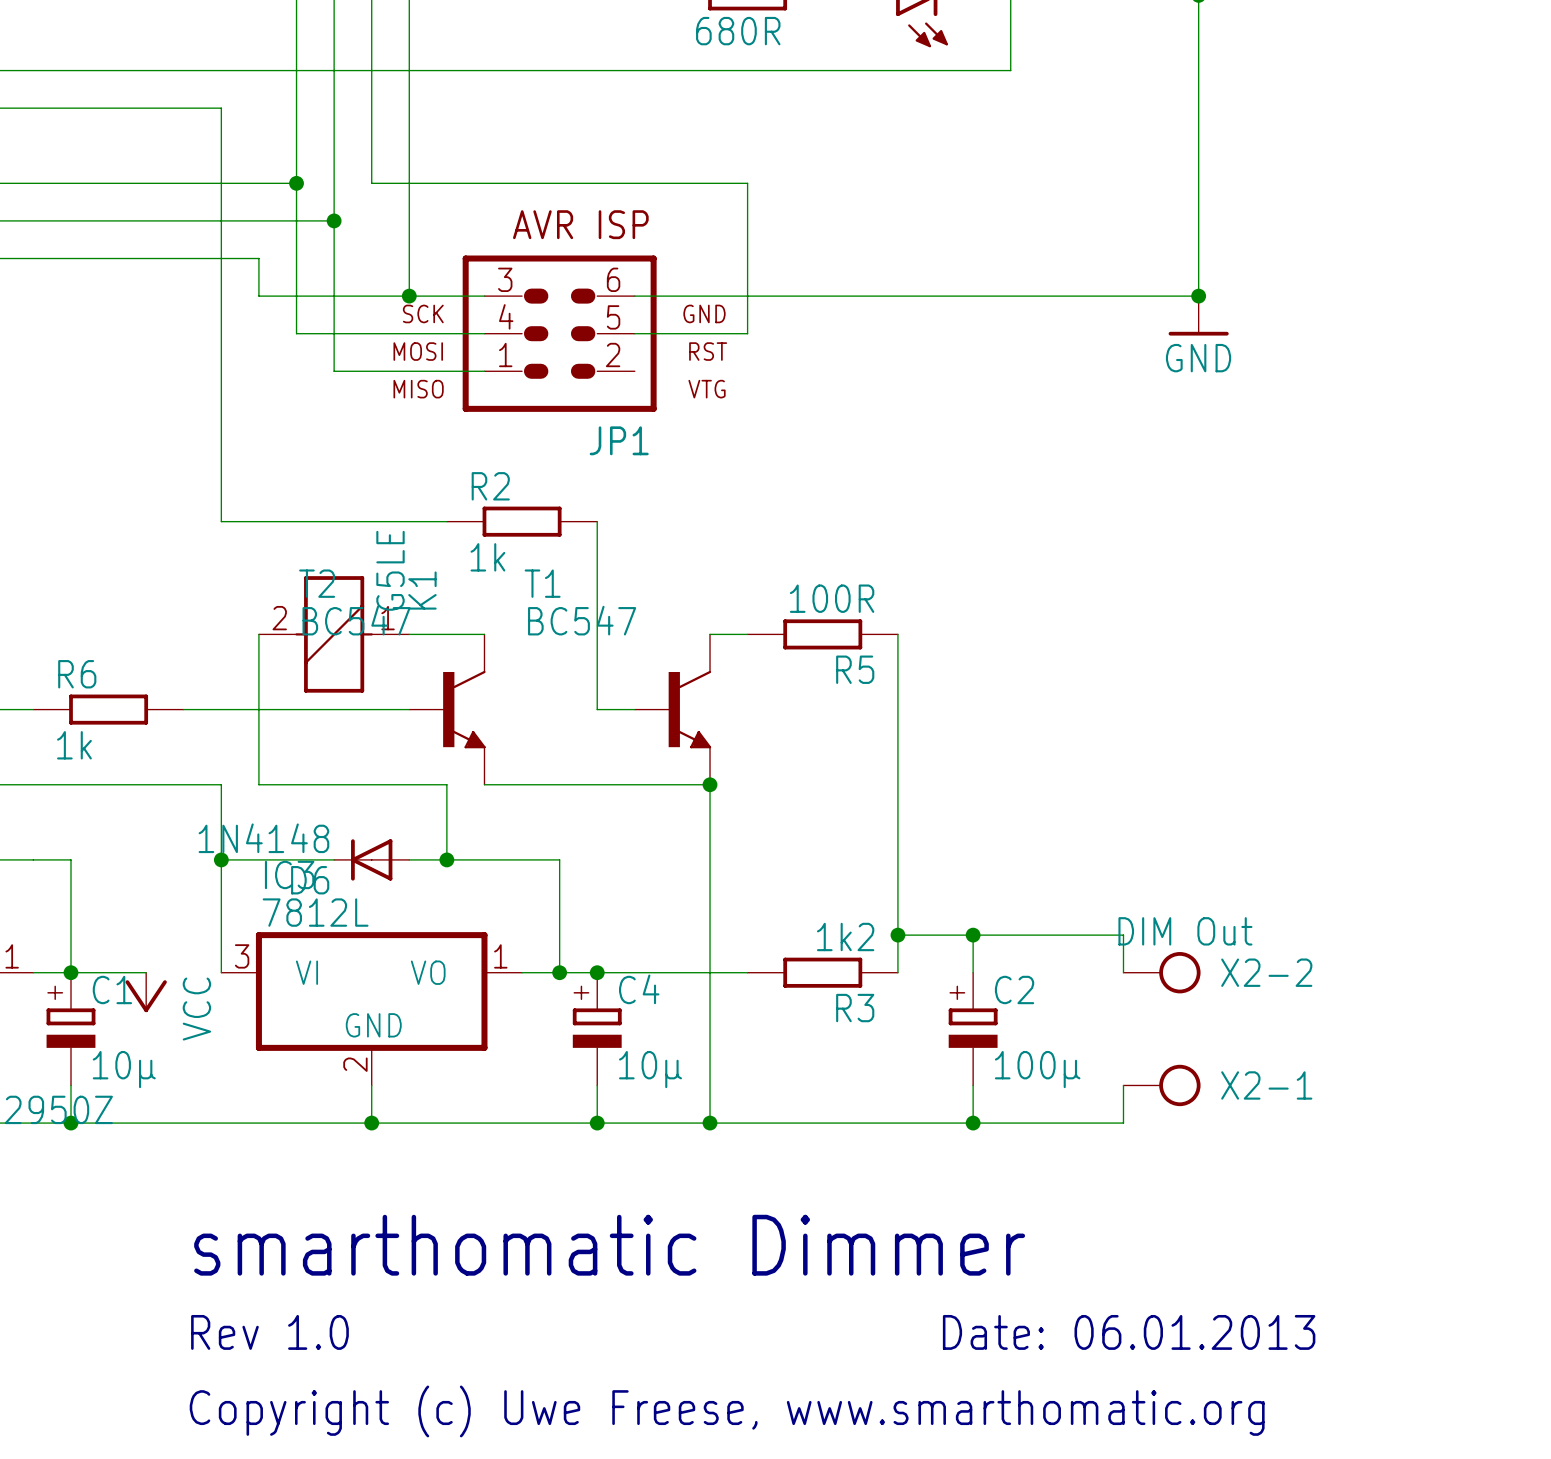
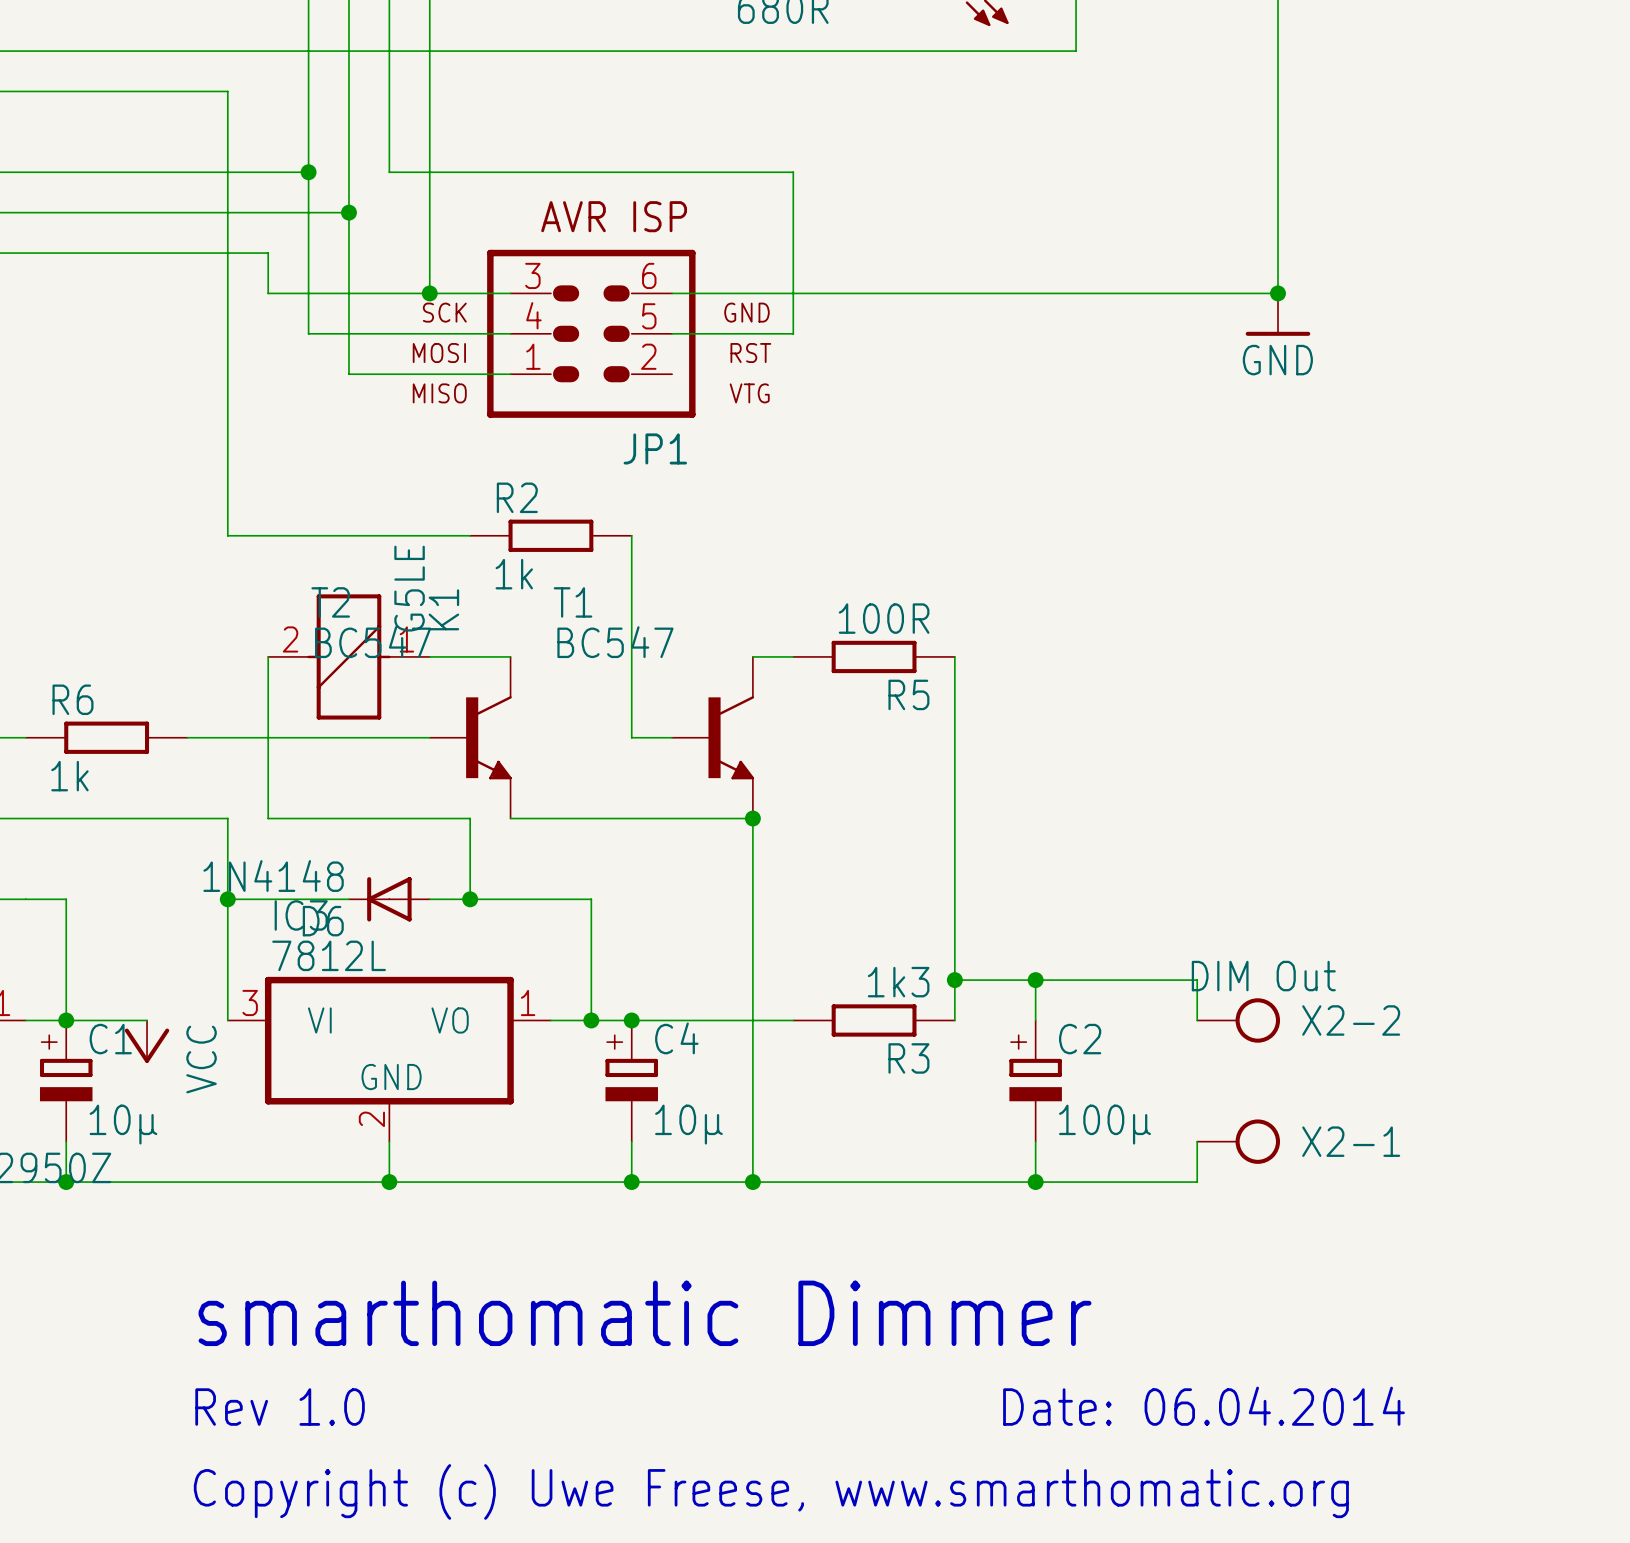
R3 value: 1k2 (845, 936) -> 1k3 (898, 982)
text: Date: 06.01.2013 (1129, 1332) -> Date: 06.04.2014 (1204, 1406)

